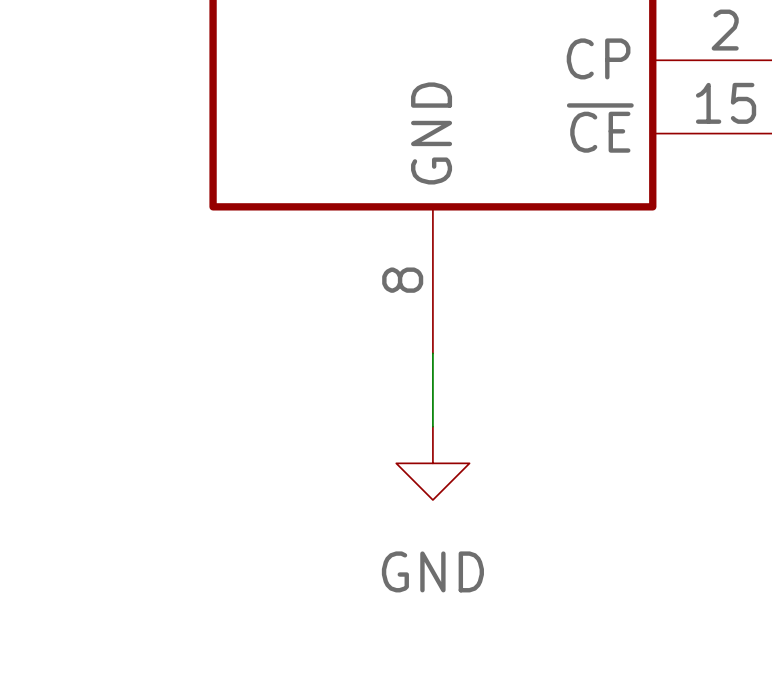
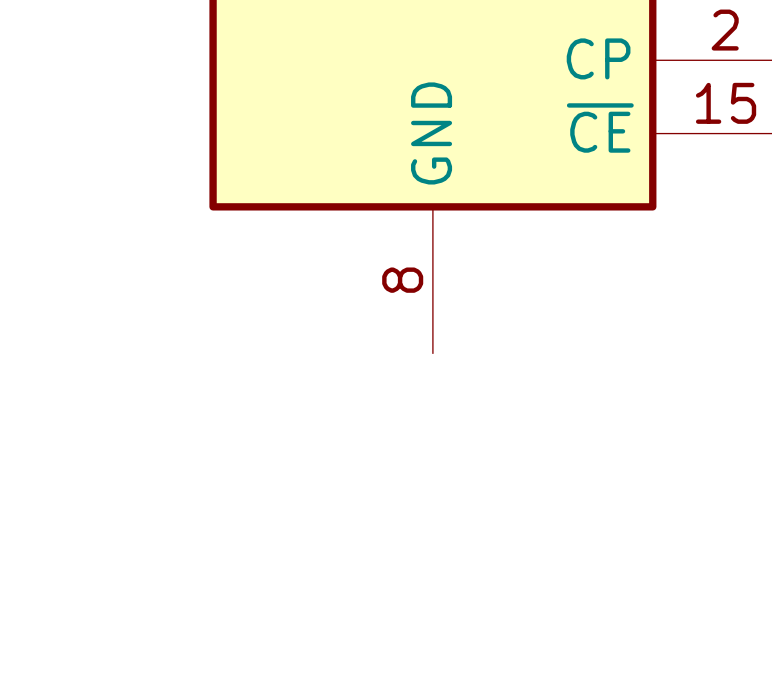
wire: (432, 353) (432, 426) -> none
power symbol: GND (432, 463) -> none

